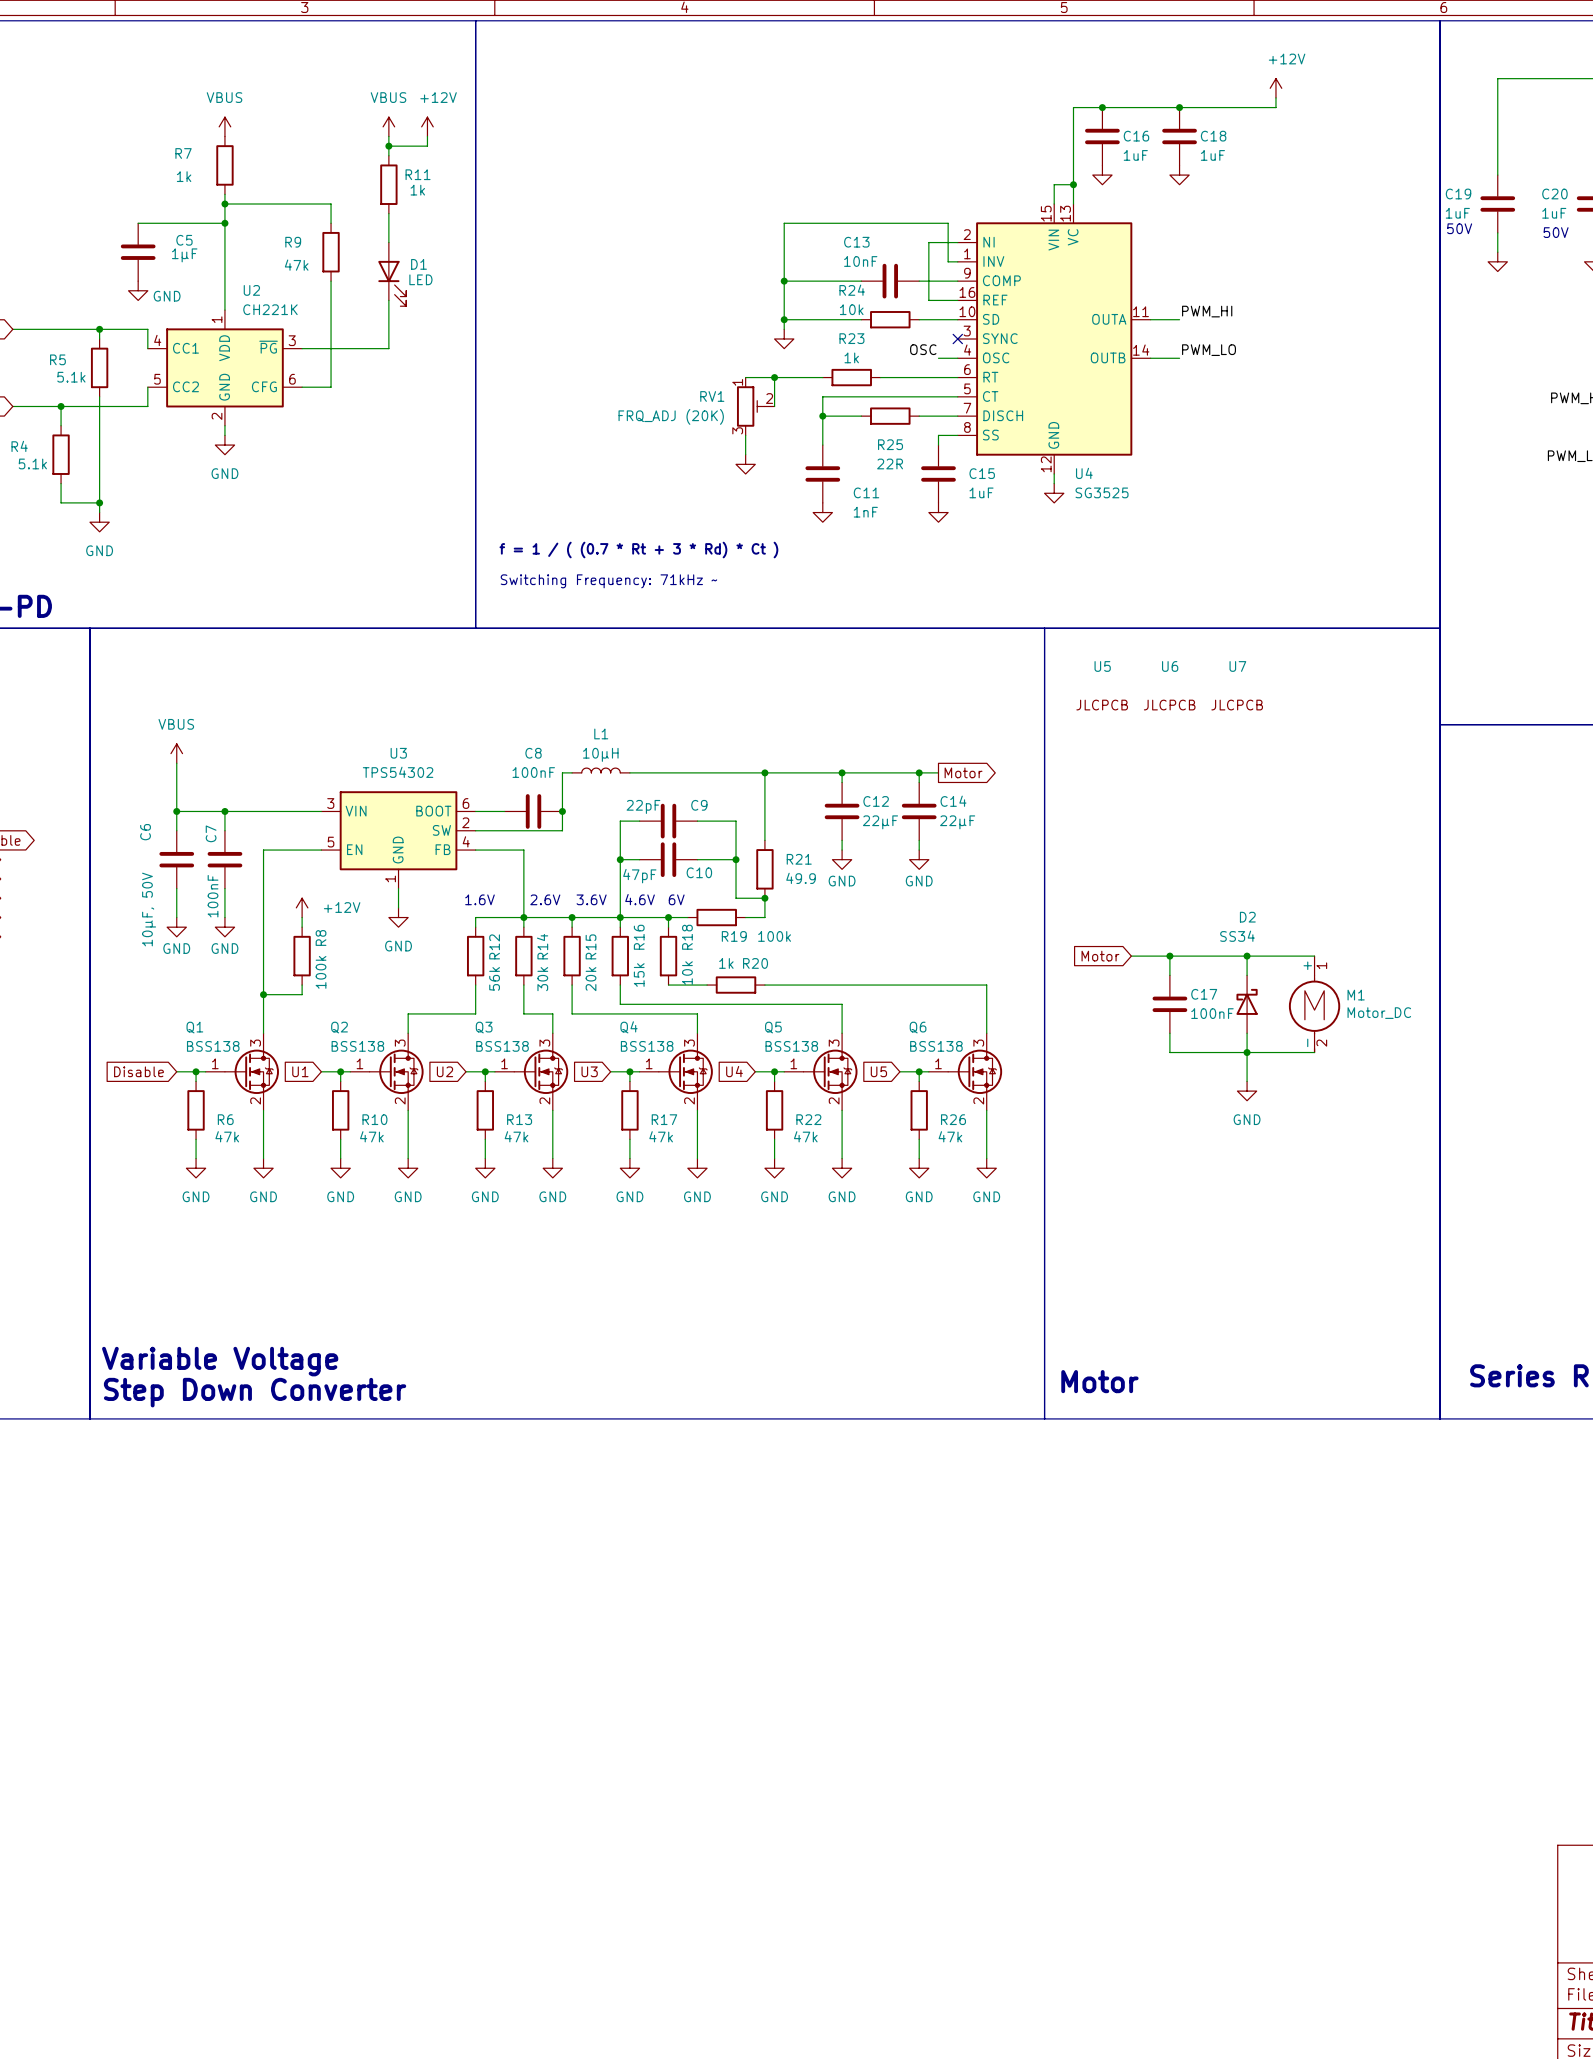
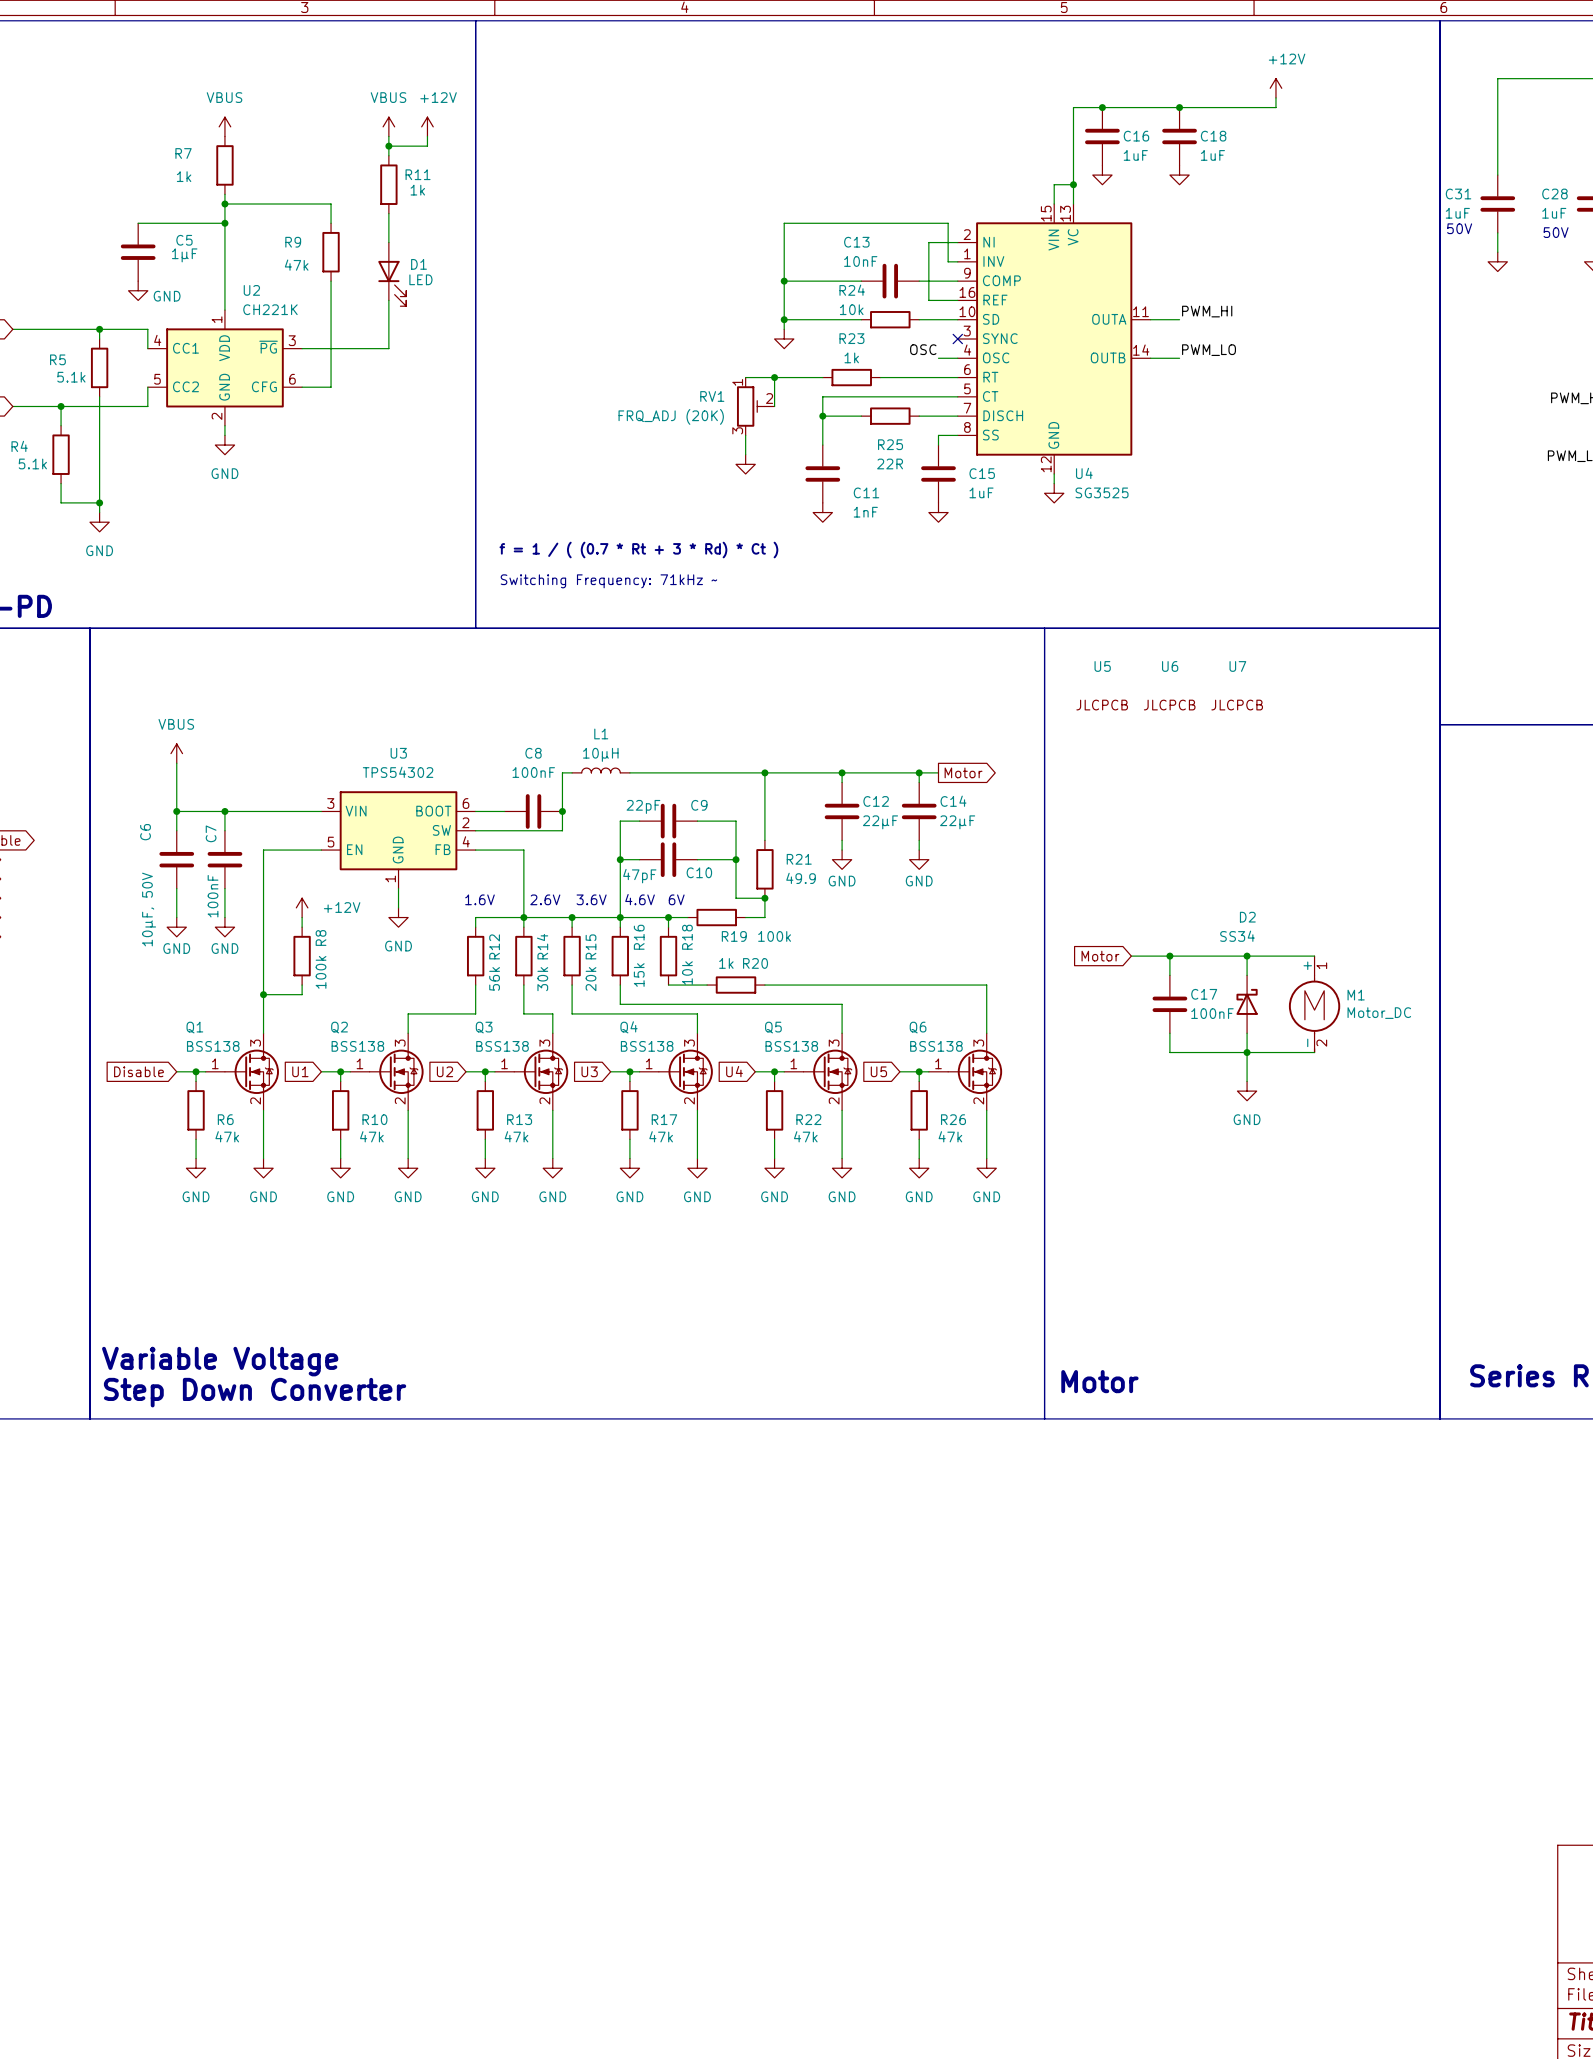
C19 name: C19 (1458, 193) -> C31 (1458, 193)
C20 name: C20 (1554, 193) -> C28 (1554, 193)

